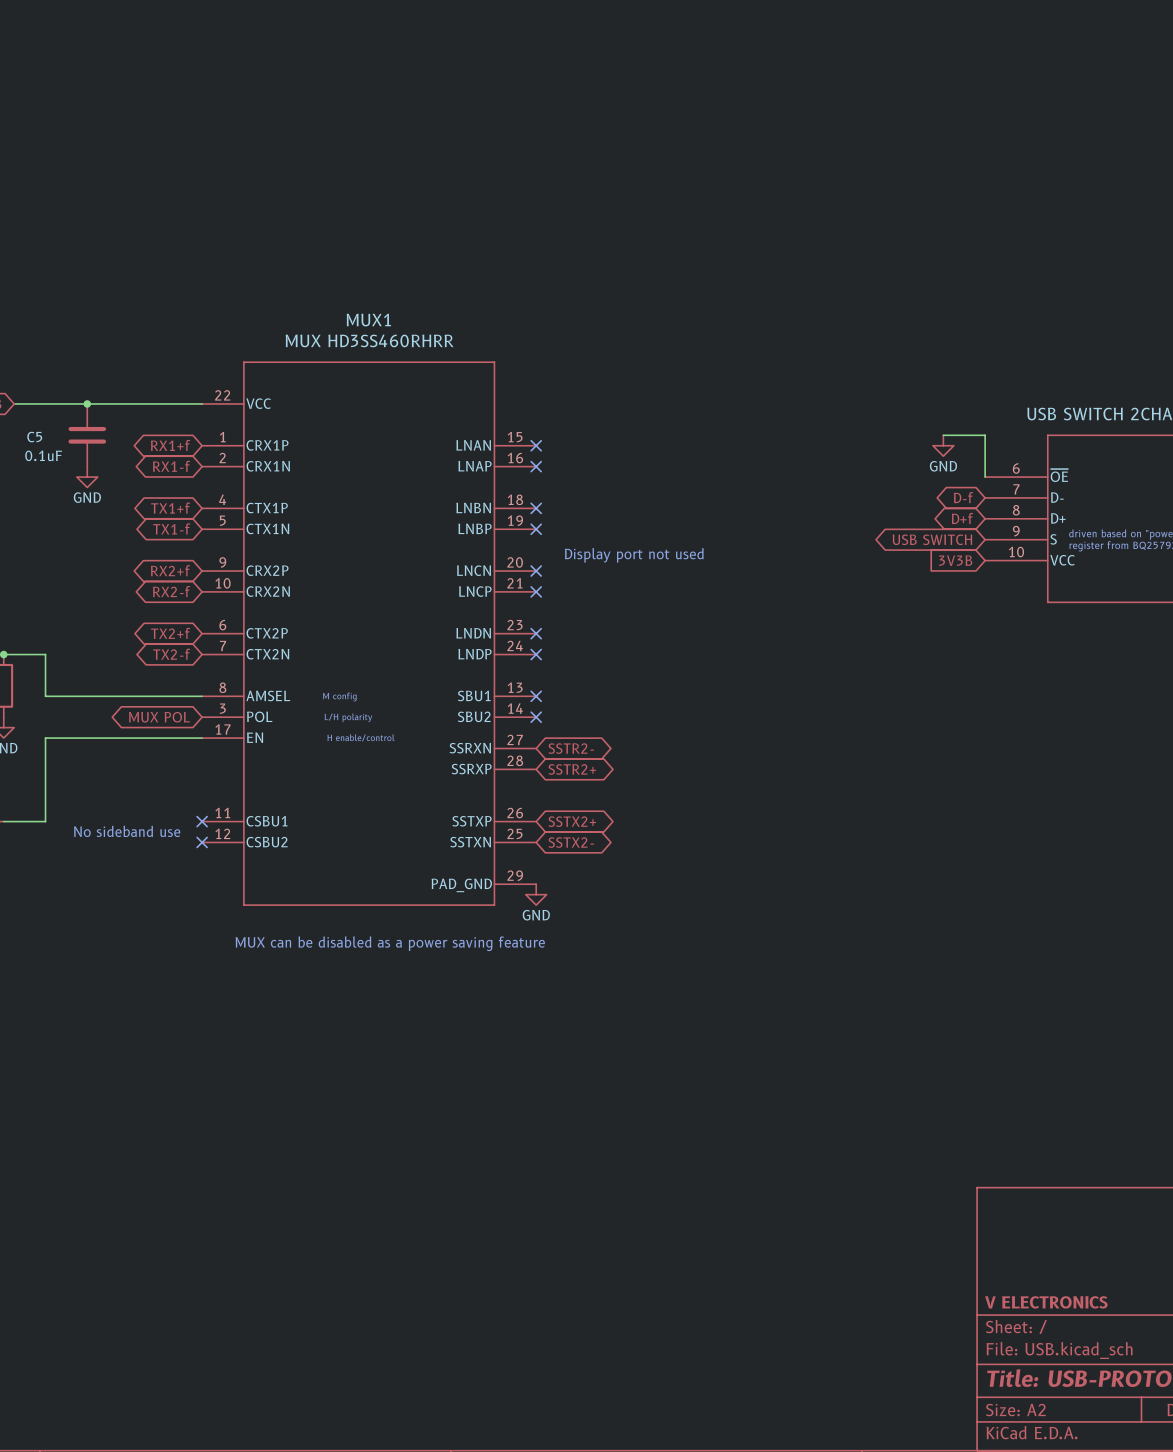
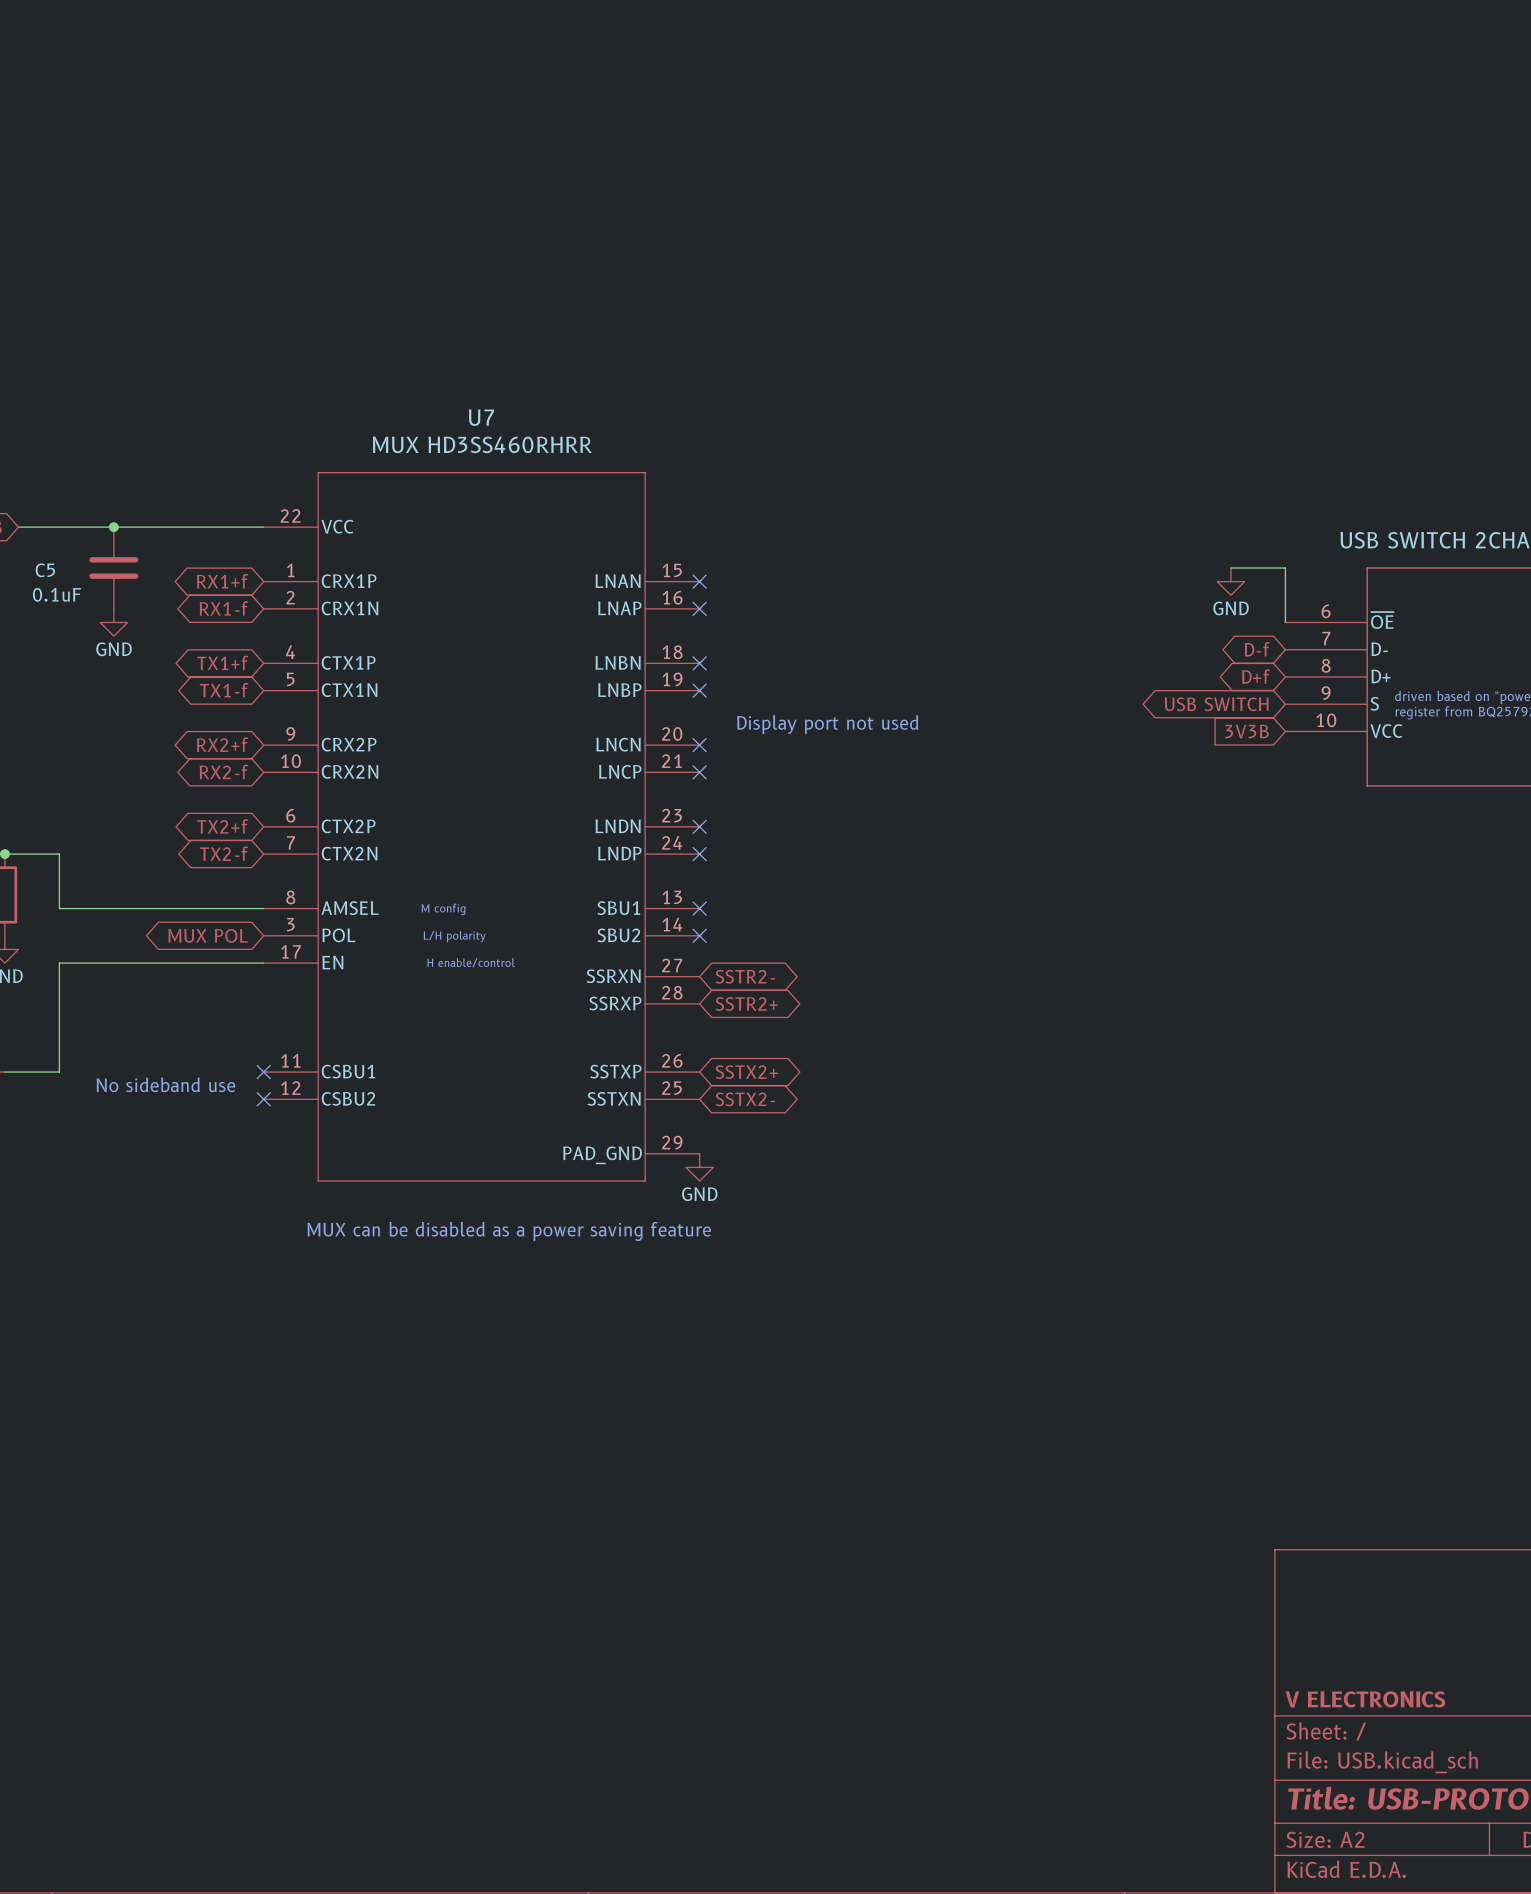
MUX1 name: MUX1 (368, 320) -> U7 (481, 417)

